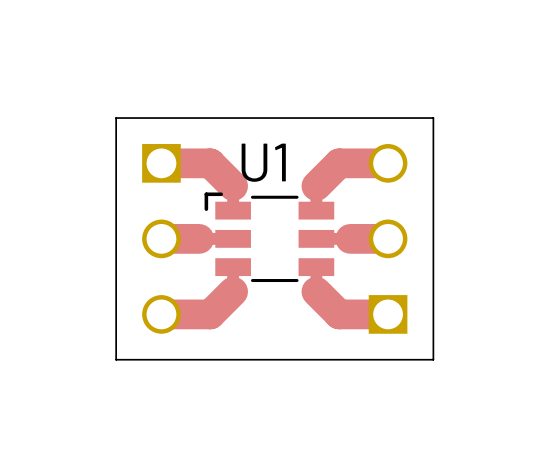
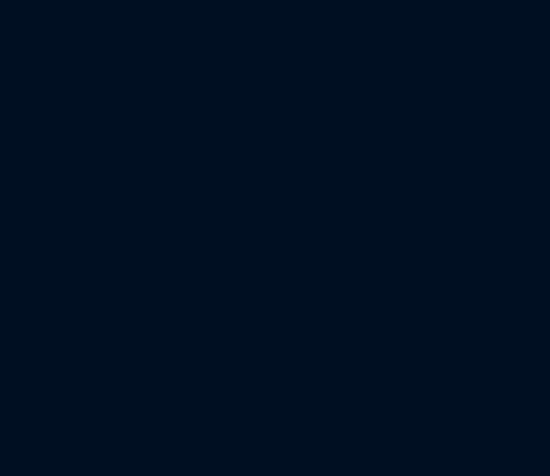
board edge: (116, 118) (116, 359) (433, 359) (433, 118) (116, 118) -> none
track: (161, 163) (210, 163) (233, 186) (233, 210) -> none
track: (388, 163) (339, 163) (316, 186) (316, 210) -> none
U1: (269, 237) -> none
track: (161, 238) (233, 238) -> none
part: (161, 238) -> none
track: (316, 238) (388, 238) -> none
part: (388, 238) -> none
track: (233, 267) (233, 291) (210, 314) (161, 314) -> none
track: (316, 267) (316, 291) (339, 314) (388, 314) -> none

